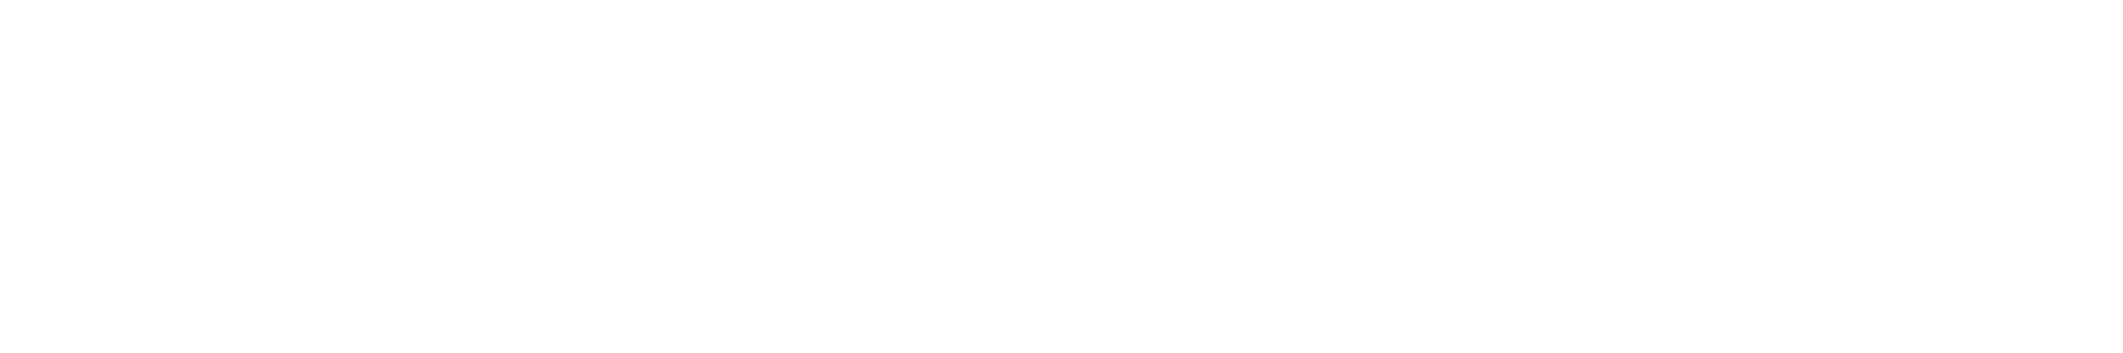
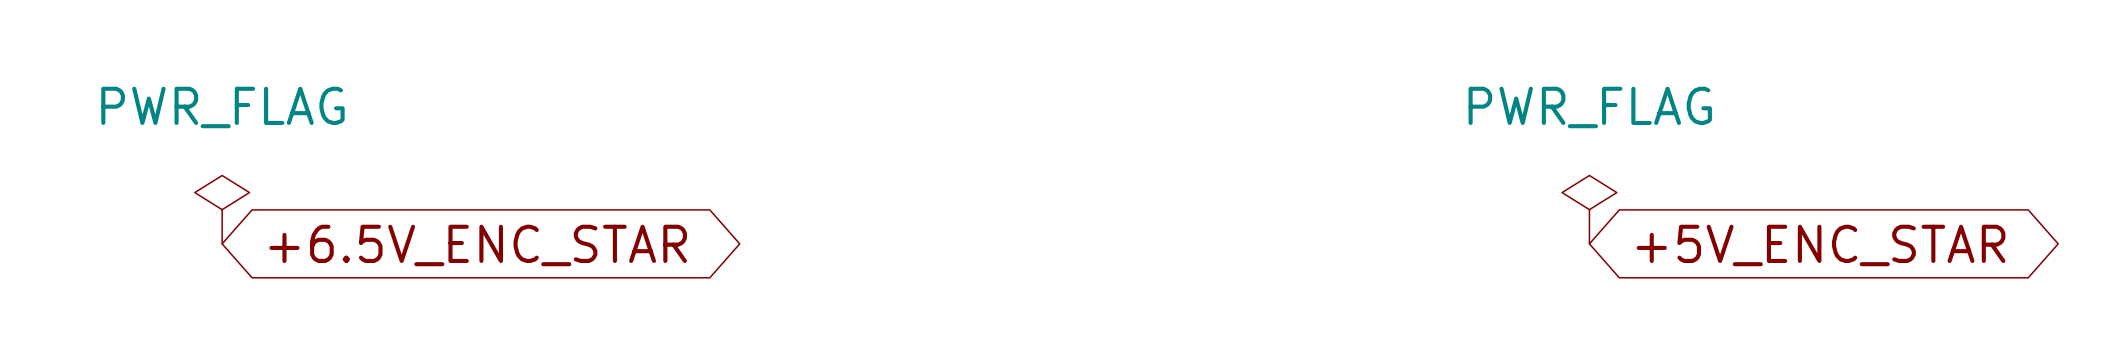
power symbol: none -> PWR_FLAG (222, 209)
power symbol: none -> PWR_FLAG (1589, 209)
global label: none -> +6.5V_ENC_STAR (478, 245)
global label: none -> +5V_ENC_STAR (1821, 245)

